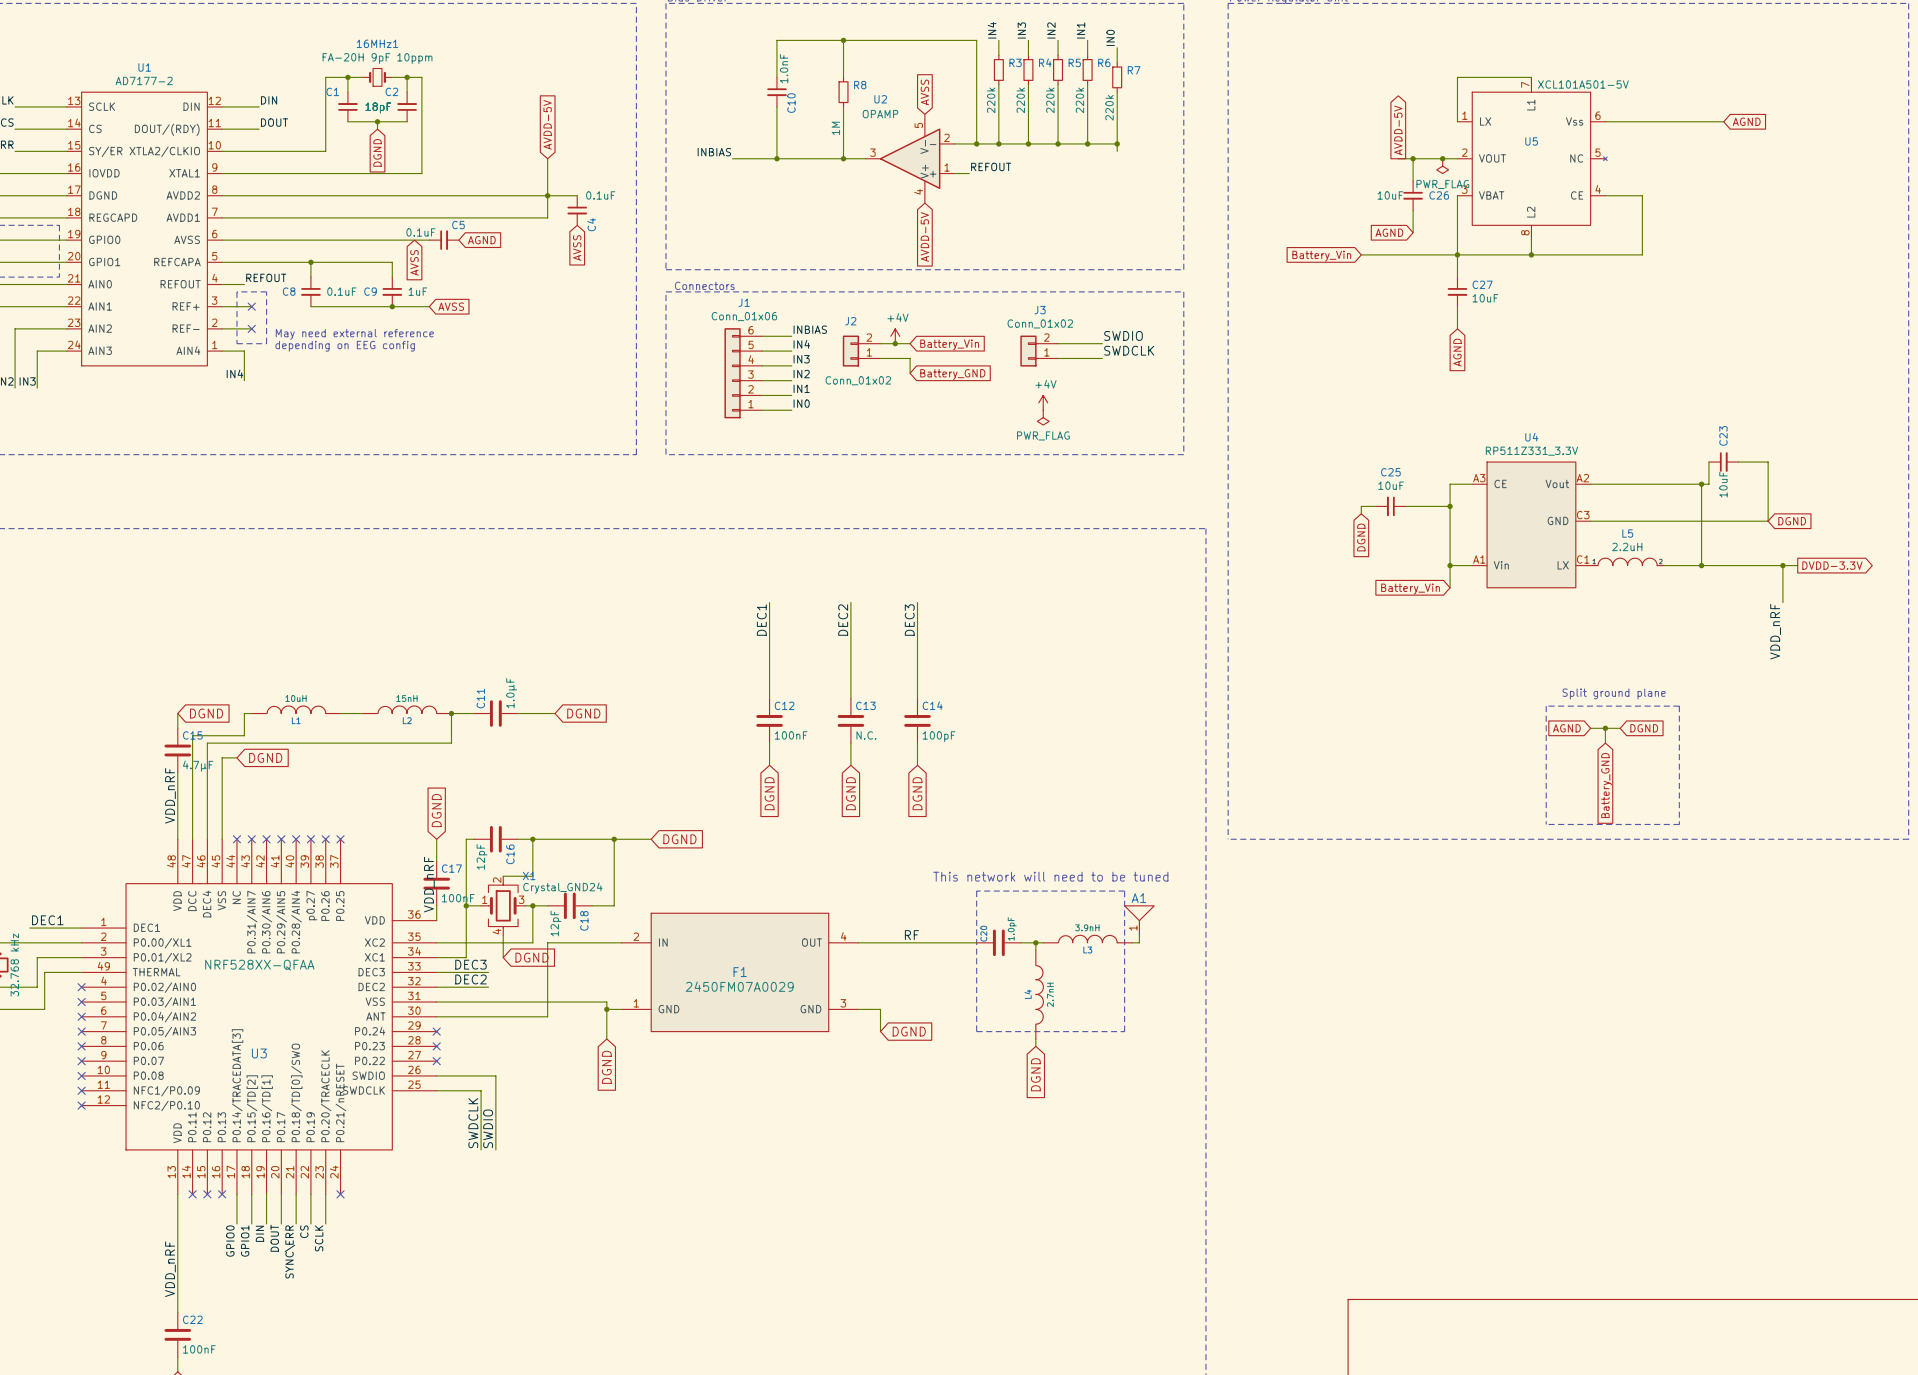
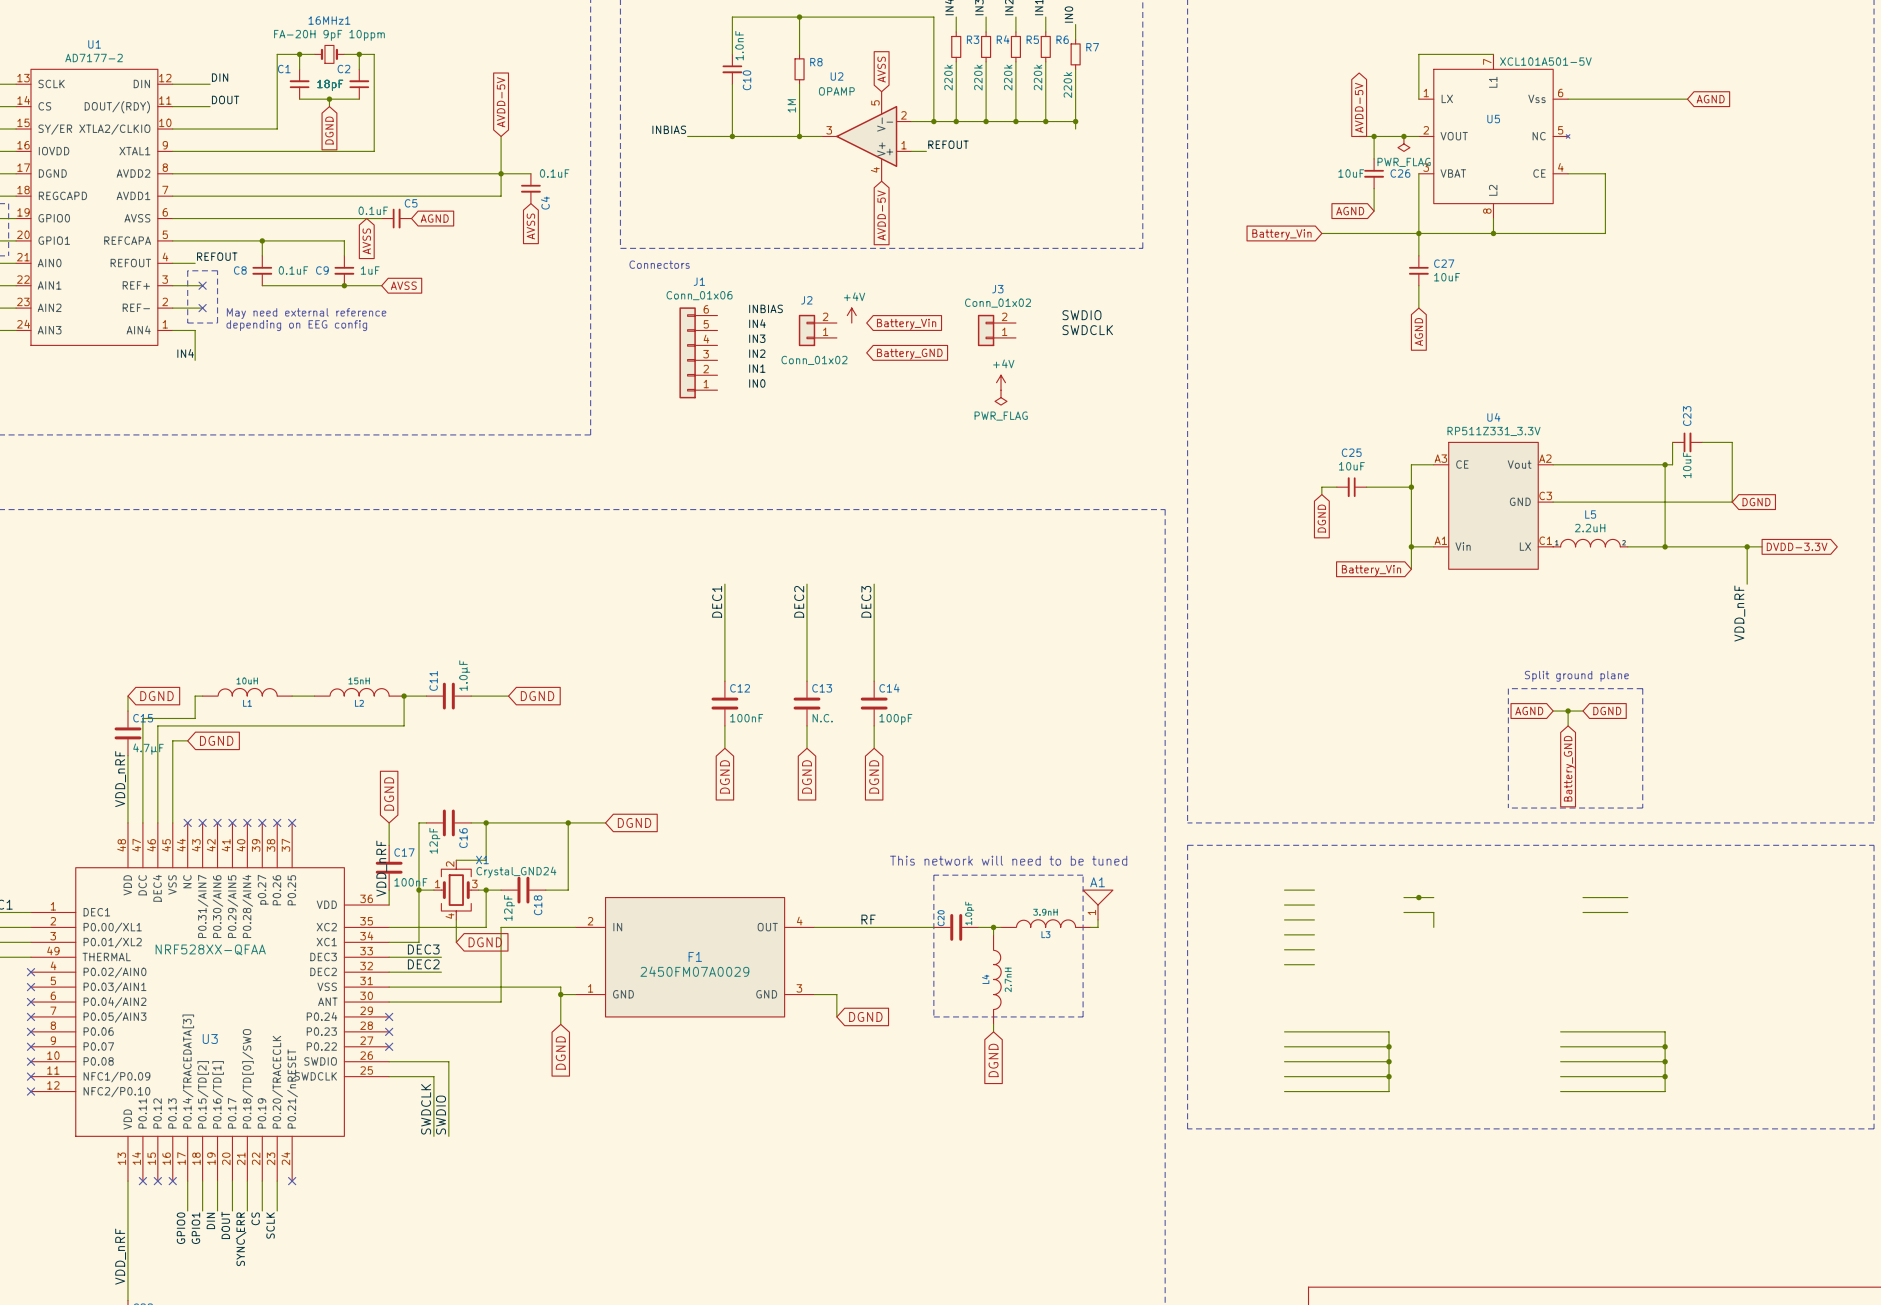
line: (665, 291) (1183, 291) (1183, 454) (665, 454) (665, 291) -> none
wire: (762, 336) (791, 336) -> none
wire: (880, 343) (910, 343) -> none
junction: (895, 343) -> none
wire: (1058, 343) (1102, 343) -> none
wire: (762, 351) (791, 351) -> none
wire: (880, 358) (910, 358) (910, 373) -> none
wire: (1058, 358) (1102, 358) -> none
wire: (762, 365) (791, 365) -> none
wire: (762, 380) (791, 380) -> none
wire: (762, 395) (791, 395) -> none
wire: (762, 410) (791, 410) -> none
line: none -> (1187, 845) (1187, 1128) (1874, 1128) (1874, 845) (1187, 845)
wire: none -> (1284, 890) (1314, 890)
wire: none -> (1403, 897) (1433, 897)
junction: none -> (1418, 897)
wire: none -> (1583, 897) (1627, 897)
wire: none -> (1284, 905) (1314, 905)
wire: none -> (1403, 912) (1433, 912) (1433, 927)
wire: none -> (1583, 912) (1627, 912)
wire: none -> (1284, 919) (1314, 919)
wire: none -> (1284, 934) (1314, 934)
wire: none -> (1284, 949) (1314, 949)
wire: none -> (1284, 964) (1314, 964)
wire: none -> (1284, 1031) (1389, 1031) (1389, 1091) (1284, 1091)
wire: none -> (1560, 1031) (1665, 1031) (1665, 1091) (1560, 1091)
wire: none -> (1284, 1046) (1389, 1046)
junction: none -> (1389, 1046)
wire: none -> (1560, 1046) (1665, 1046)
junction: none -> (1665, 1046)
wire: none -> (1284, 1061) (1389, 1061)
junction: none -> (1389, 1061)
wire: none -> (1560, 1061) (1665, 1061)
junction: none -> (1665, 1061)
wire: none -> (1284, 1076) (1389, 1076)
junction: none -> (1389, 1076)
wire: none -> (1560, 1076) (1665, 1076)
junction: none -> (1665, 1076)

